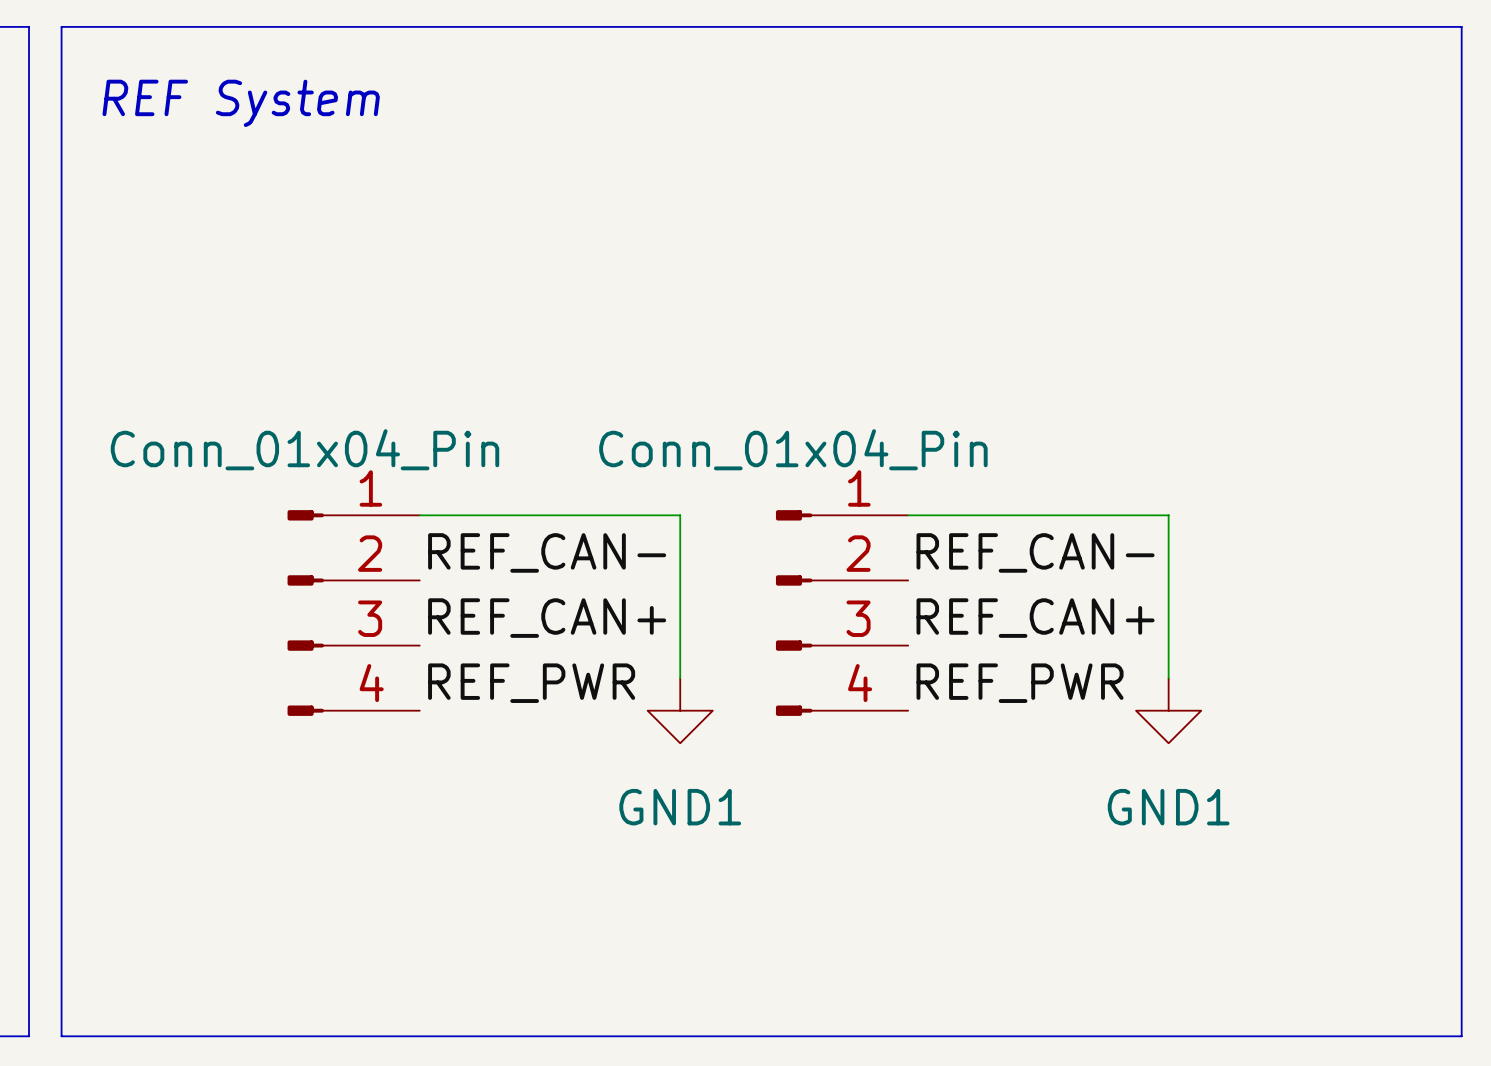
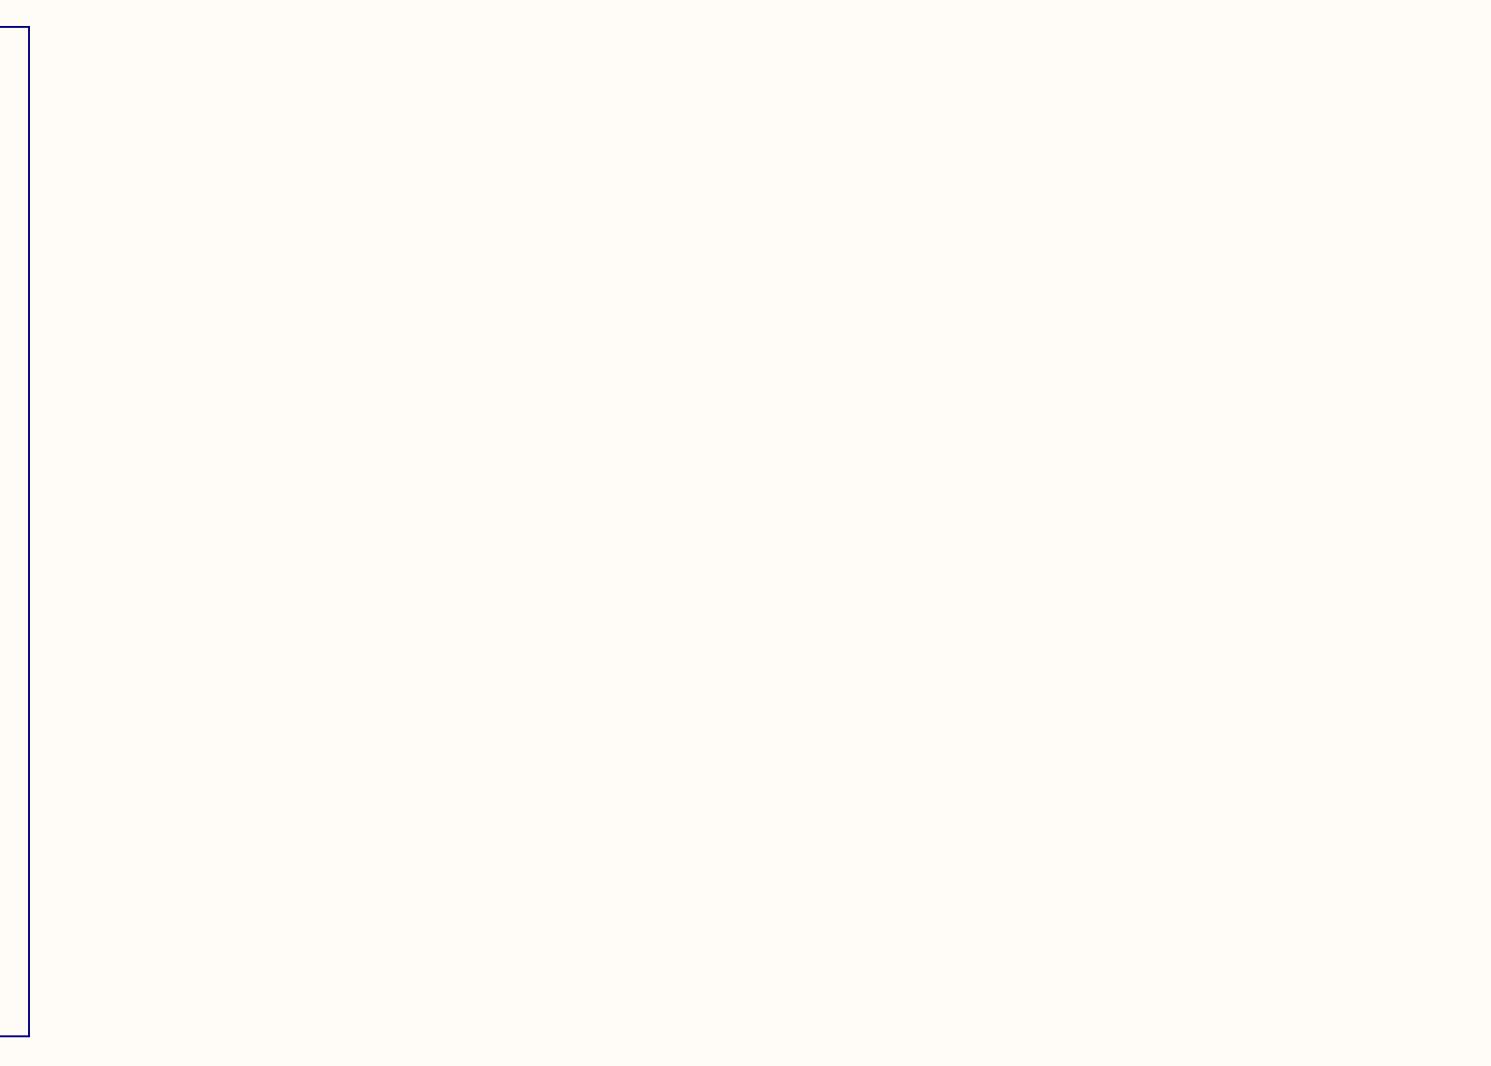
line: (61, 26) (1461, 26) (1461, 1036) (61, 1036) (61, 26) -> none
text: REF System (241, 103) -> none
wire: (419, 515) (680, 515) (680, 678) -> none
wire: (908, 515) (1168, 515) (1168, 678) -> none
label: REF_CAN- (547, 552) -> none
label: REF_CAN- (1035, 552) -> none
part: Conn_01x04_Pin (353, 613) -> none
part: Conn_01x04_Pin (842, 613) -> none
label: REF_CAN+ (547, 618) -> none
label: REF_CAN+ (1035, 618) -> none
label: REF_PWR (531, 683) -> none
label: REF_PWR (1020, 683) -> none
power symbol: GND1 (680, 710) -> none
power symbol: GND1 (1168, 710) -> none

